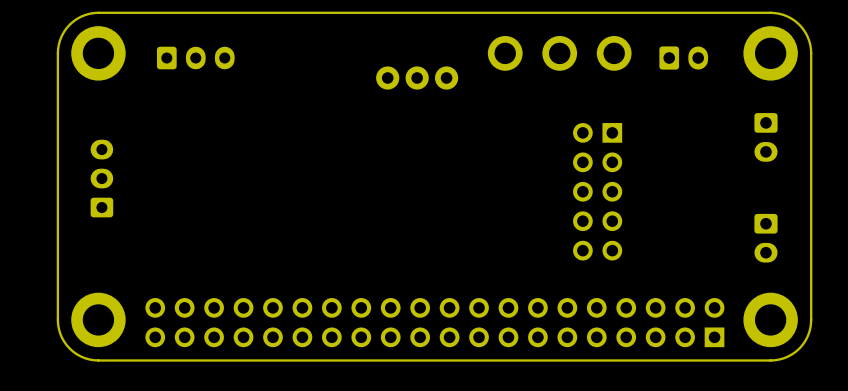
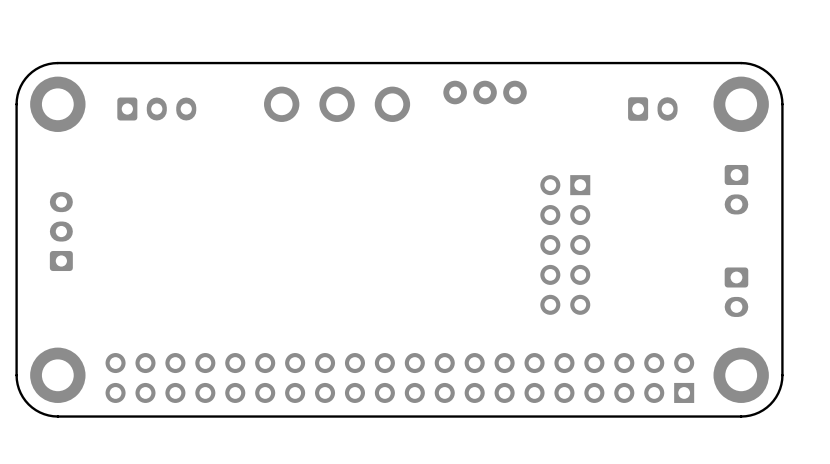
part position: (559, 53) -> (337, 104)
part position: (417, 78) -> (485, 92)

